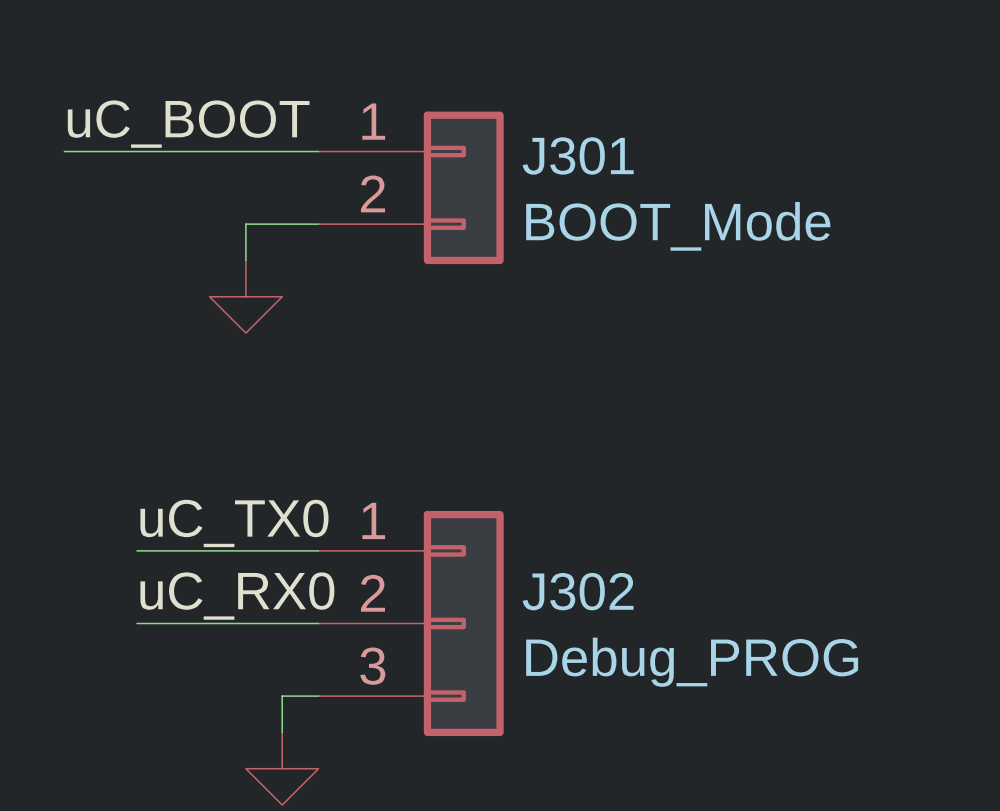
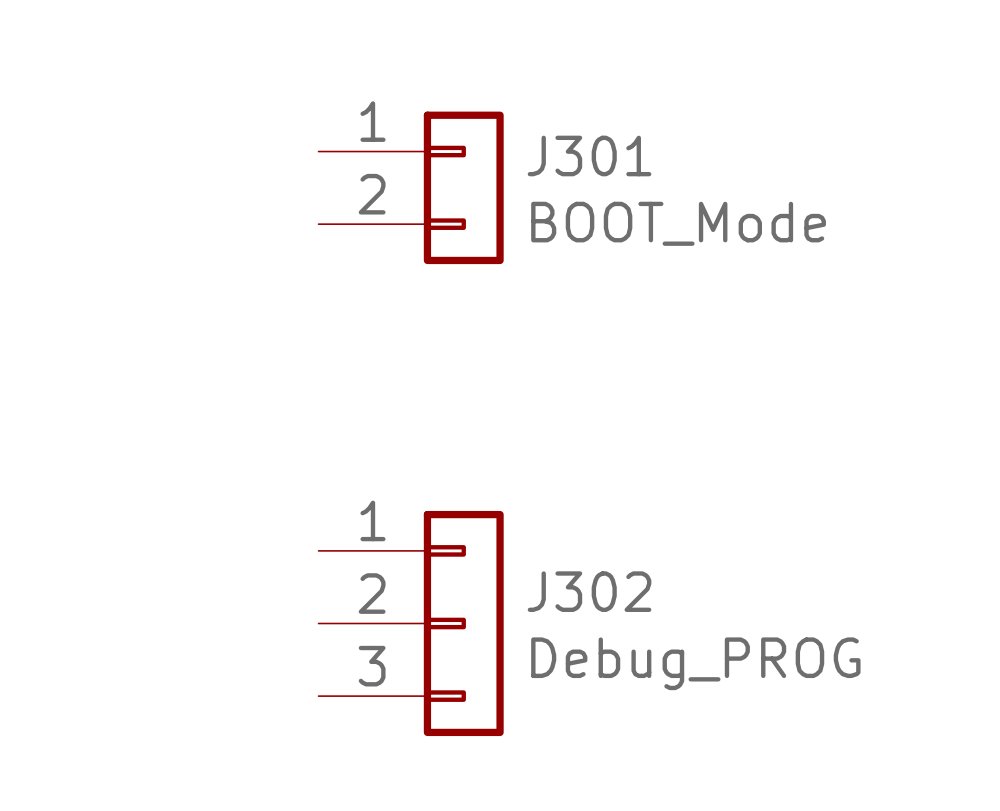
label: uC_BOOT (188, 124) -> none
wire: (64, 151) (318, 151) -> none
wire: (318, 224) (245, 224) (245, 260) -> none
power symbol: (245, 296) -> none
label: uC_TX0 (234, 523) -> none
wire: (137, 550) (318, 550) -> none
label: uC_RX0 (237, 596) -> none
wire: (137, 623) (318, 623) -> none
wire: (318, 696) (282, 696) (282, 732) -> none
power symbol: (282, 768) -> none

